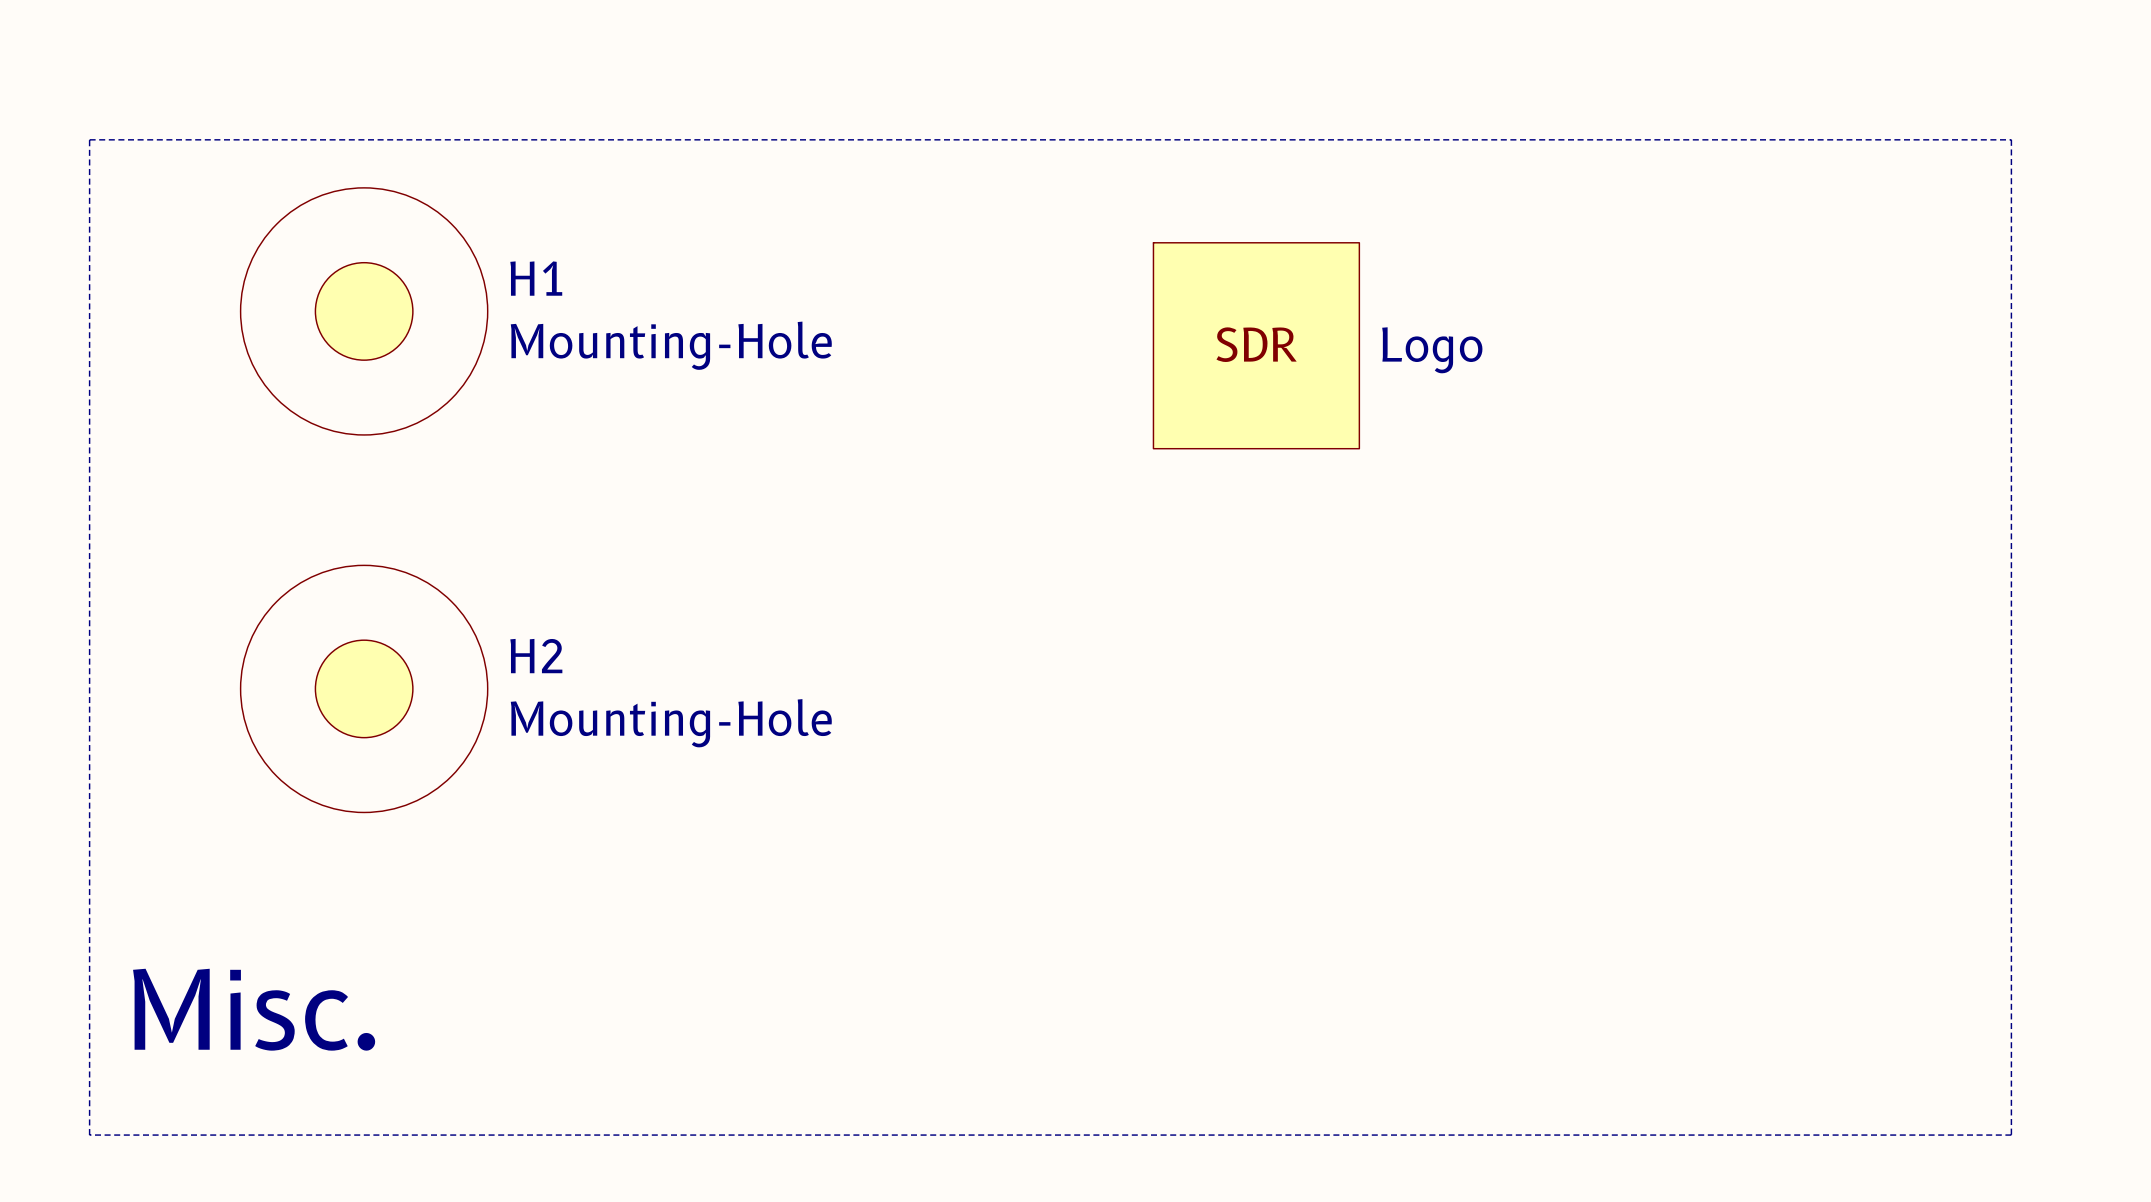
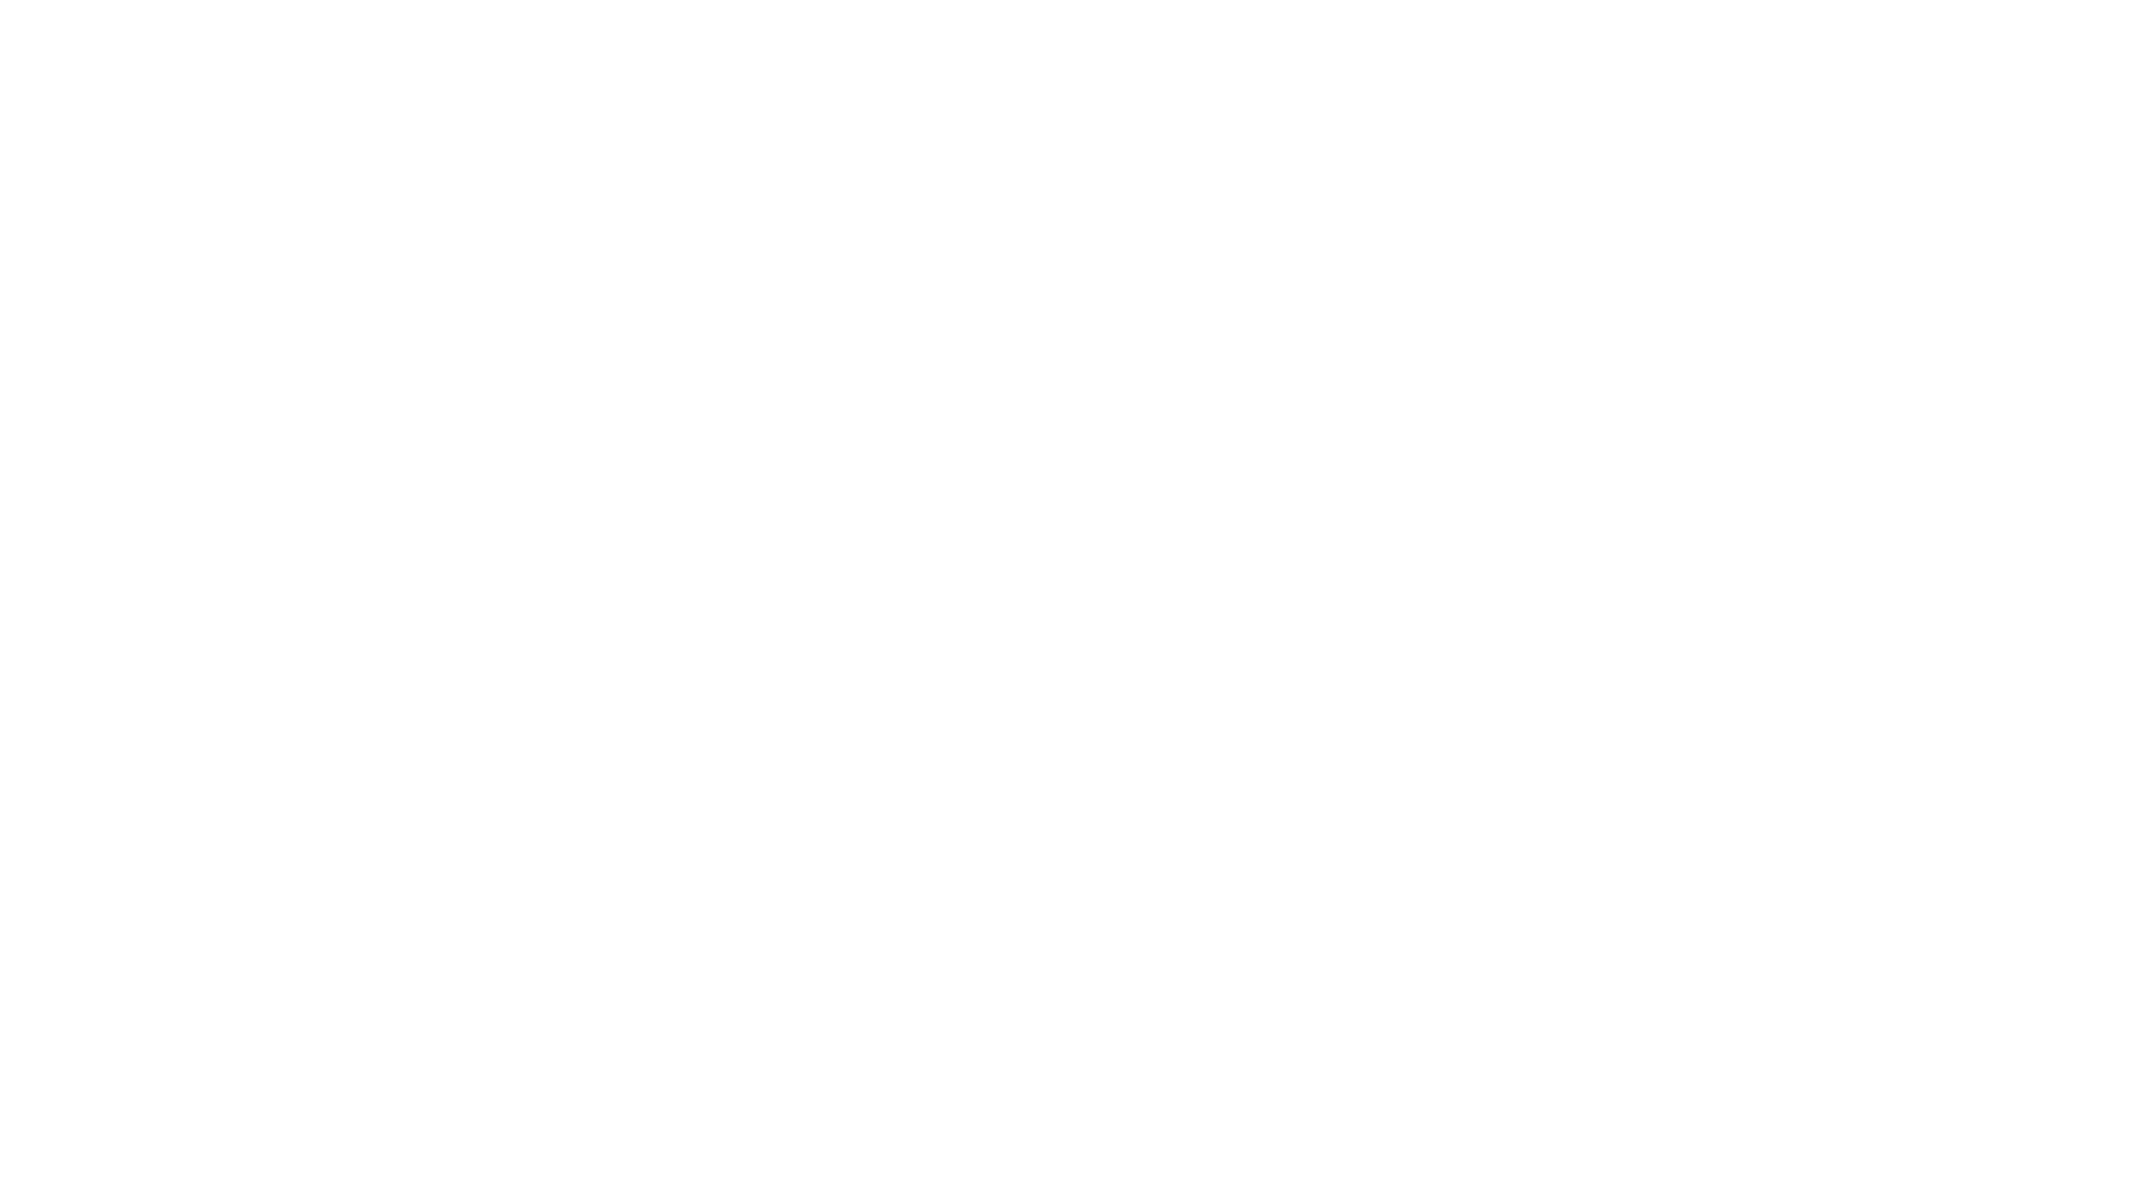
line: (89, 139) (89, 1135) (2011, 1135) (2011, 139) (89, 139) -> none
H1: Mounting-Hole (364, 311) -> none
part: Logo (1256, 345) -> none
H2: Mounting-Hole (364, 688) -> none
text: Misc. (254, 1009) -> none

